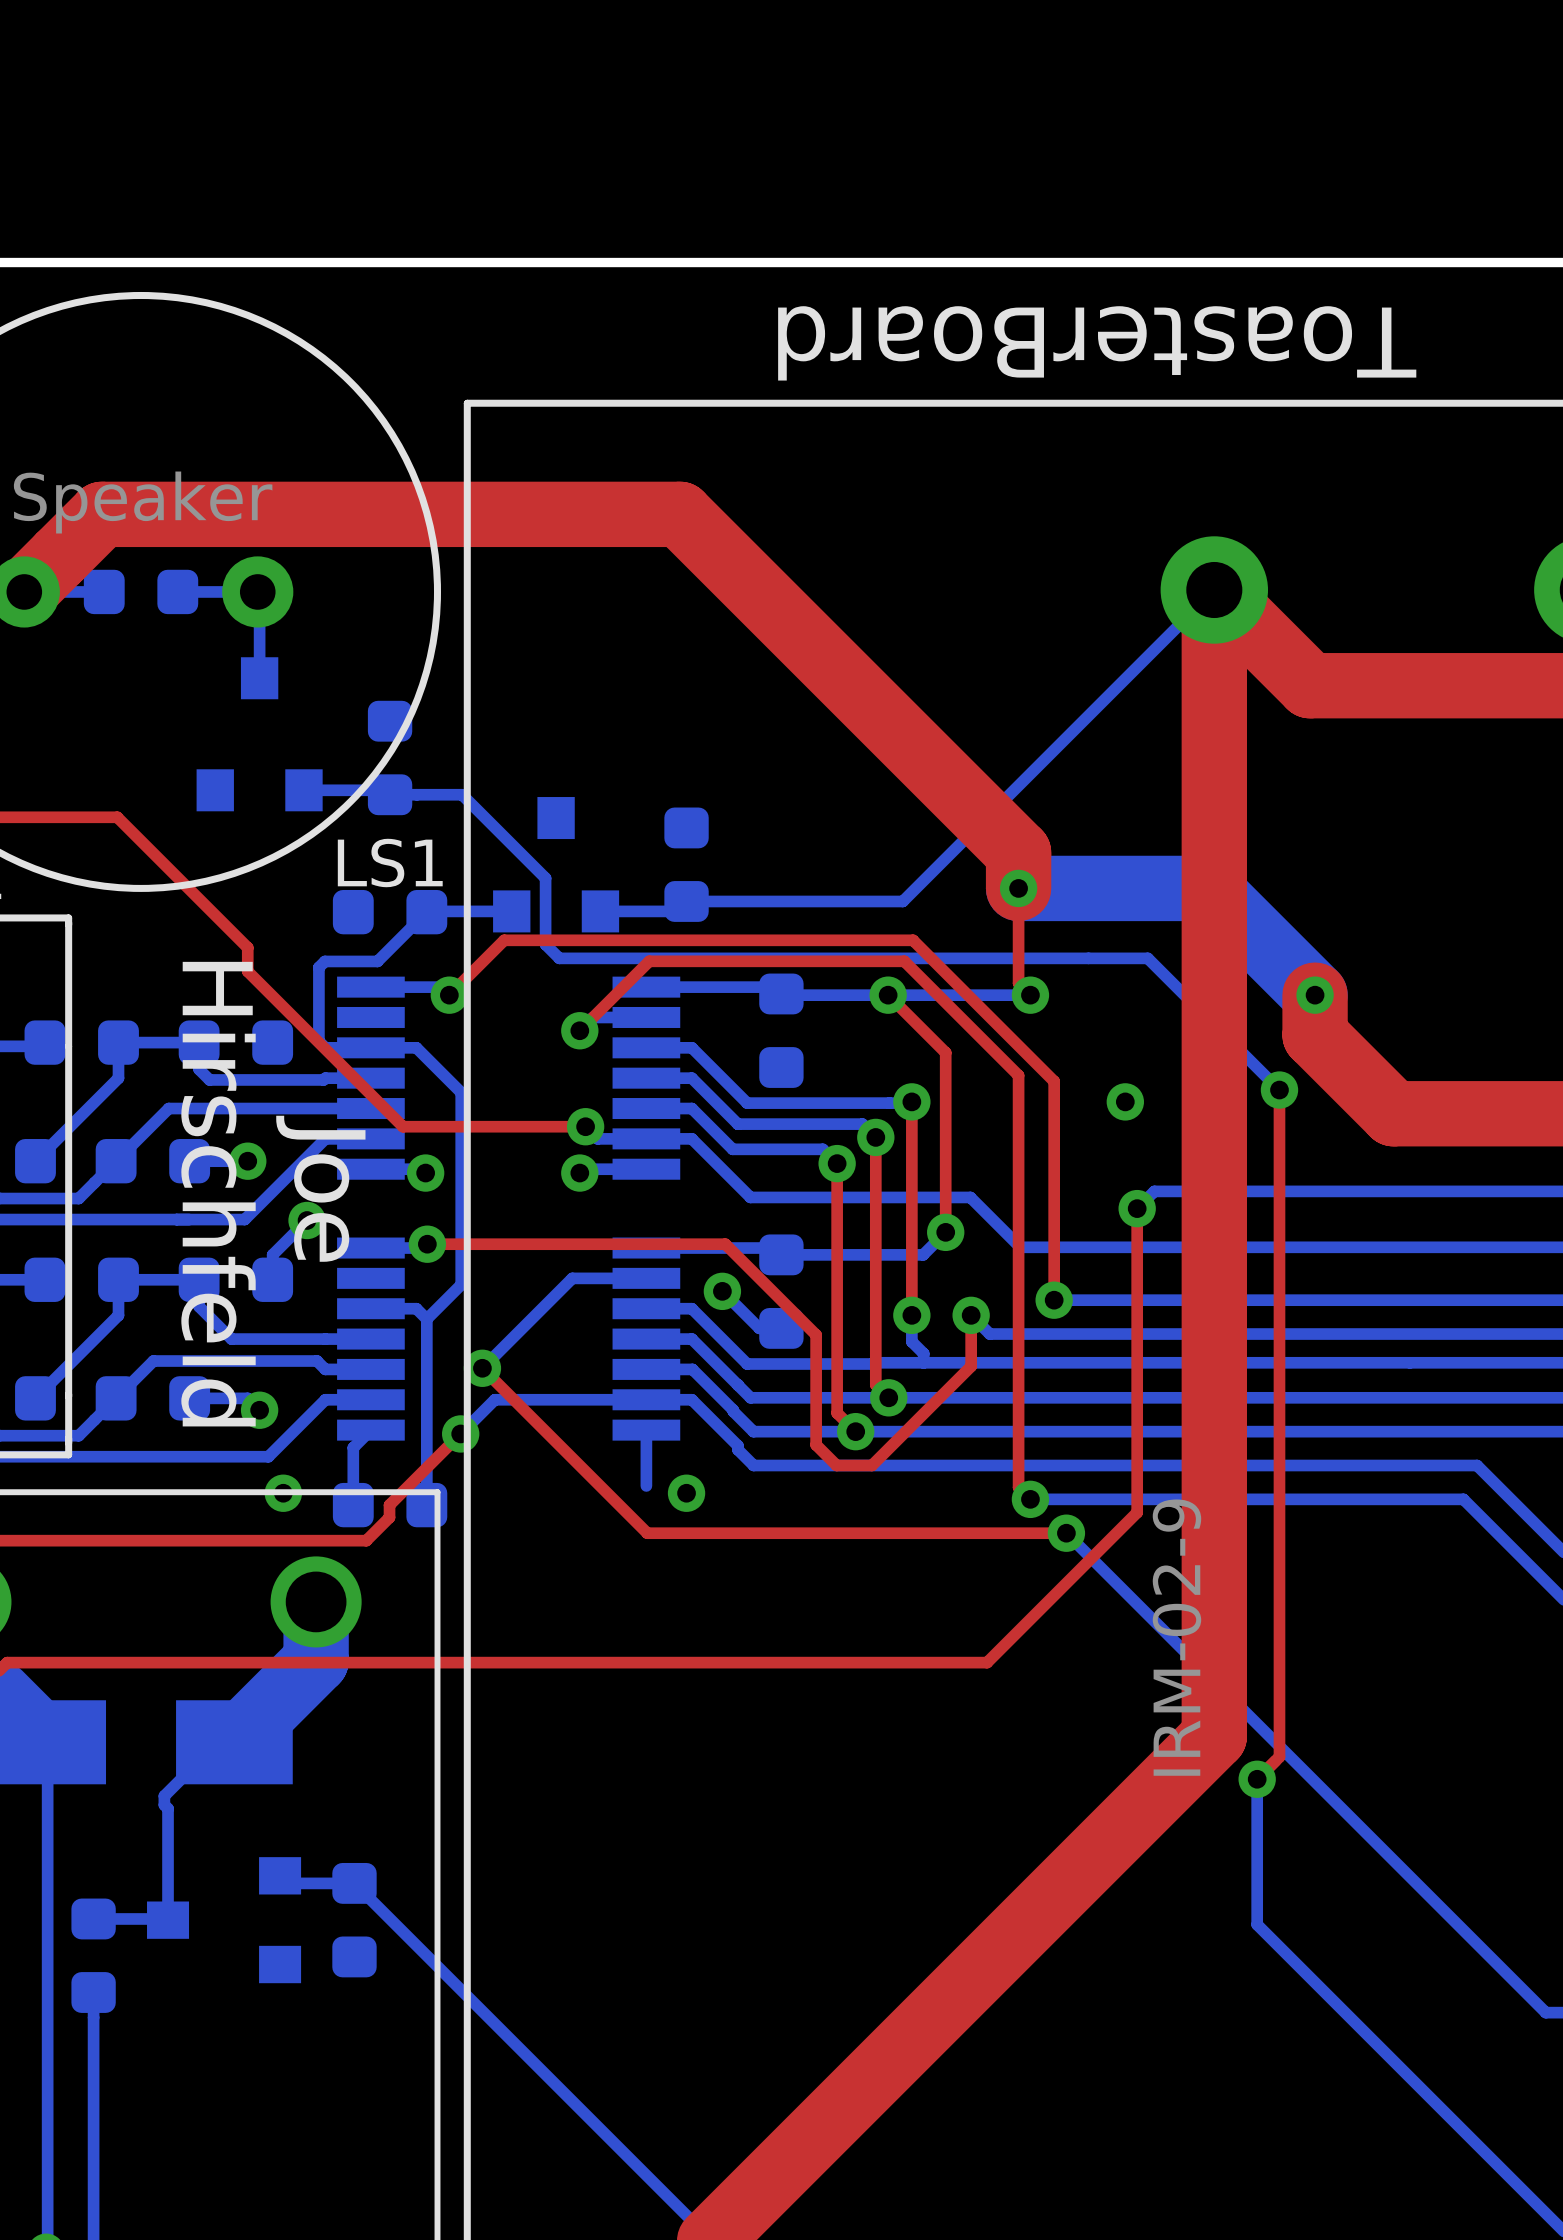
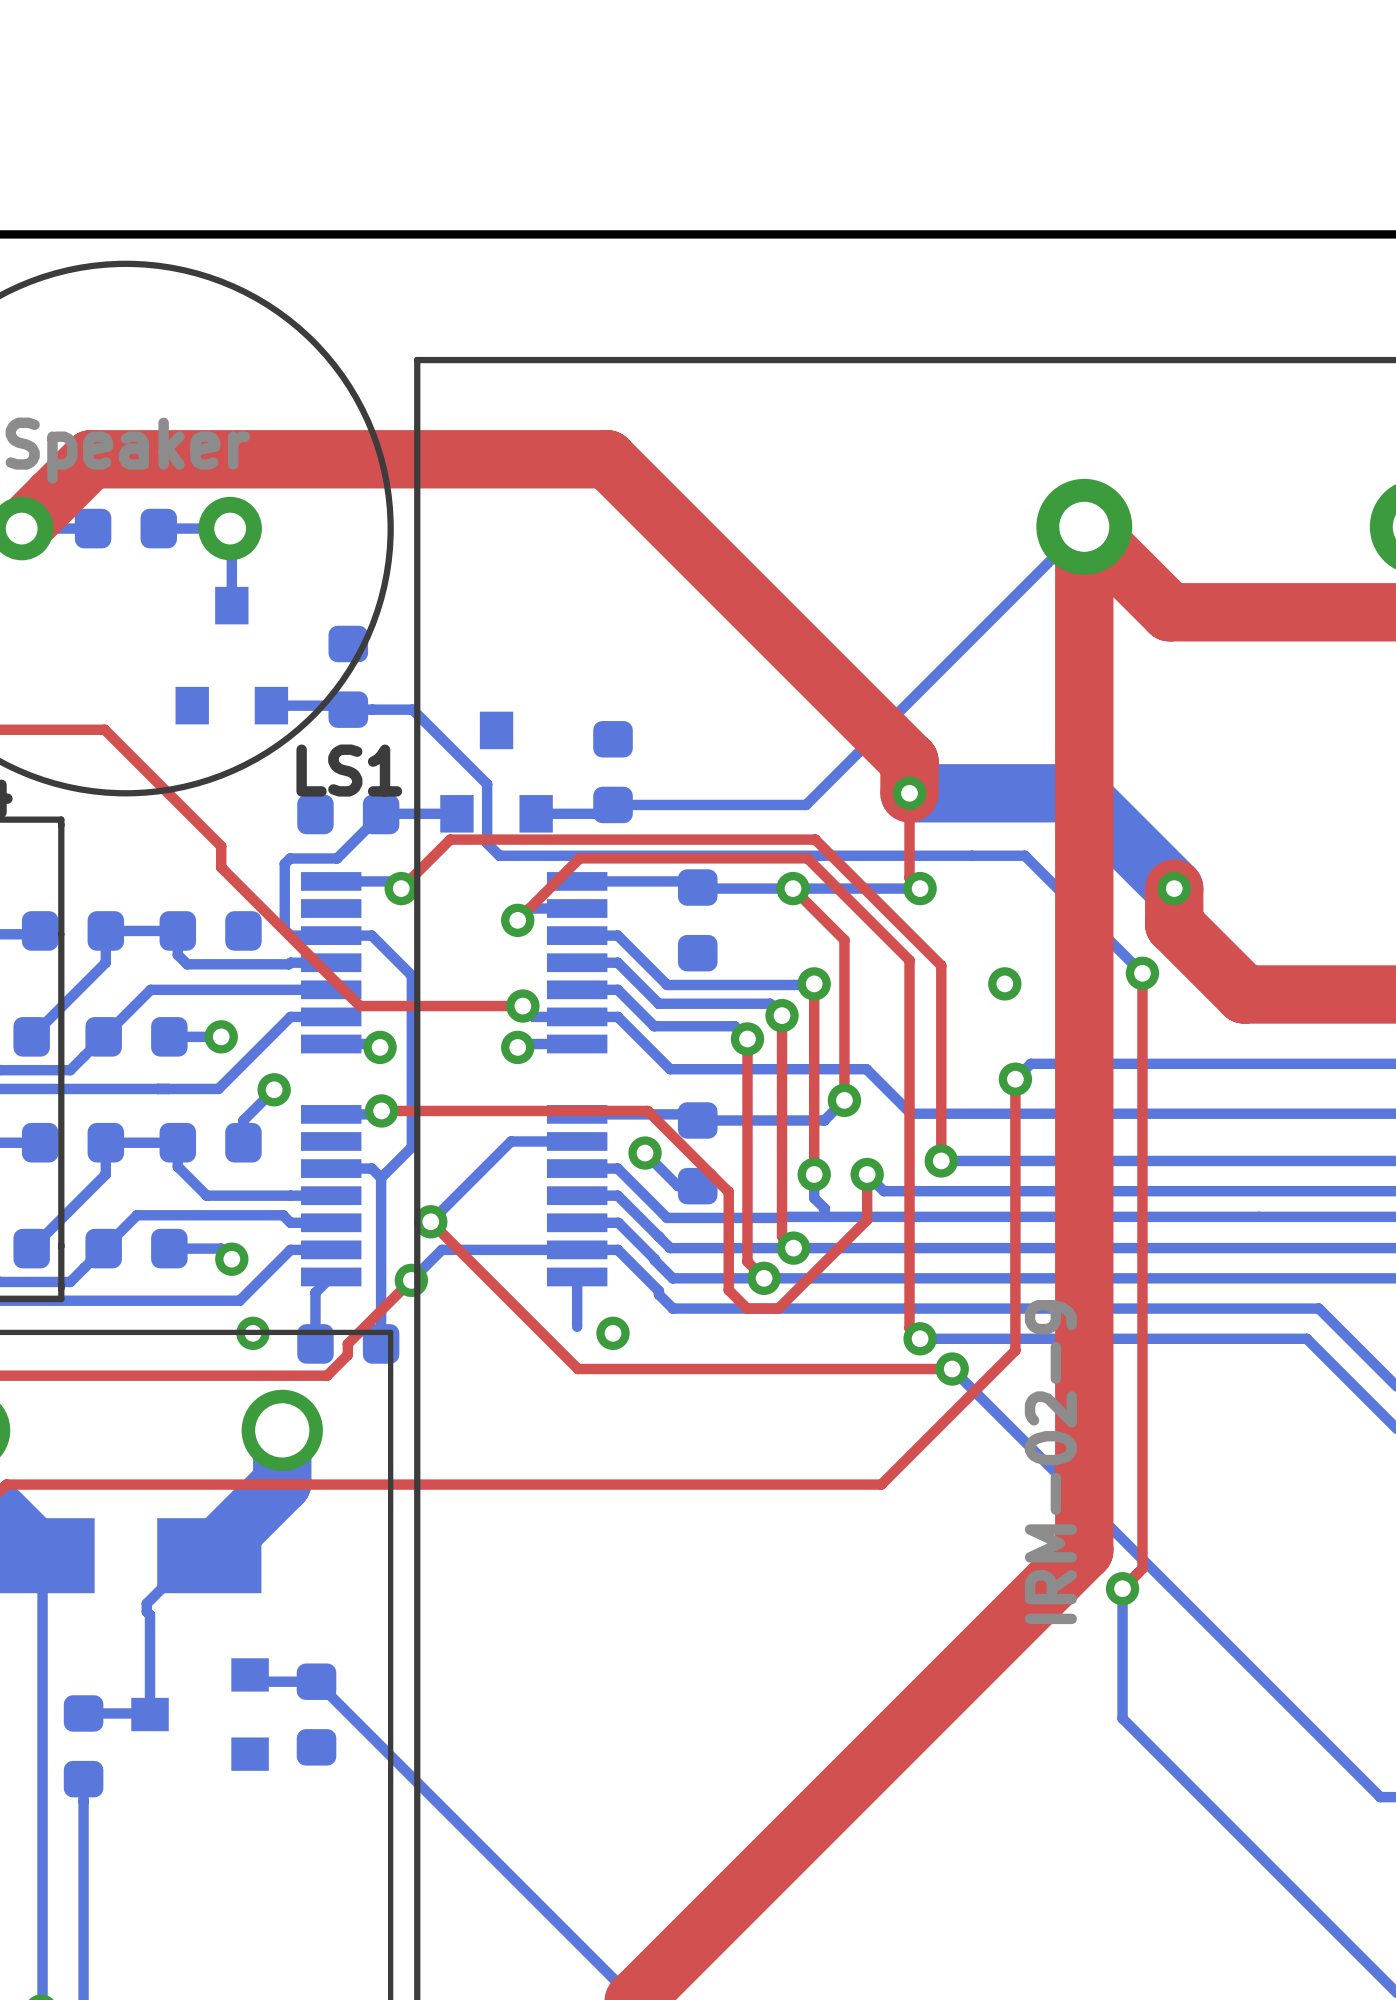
text: ToasterBoard (1097, 343) -> none
text: Joe (320, 1188) -> none
text: Hirschfeld (218, 1194) -> none

